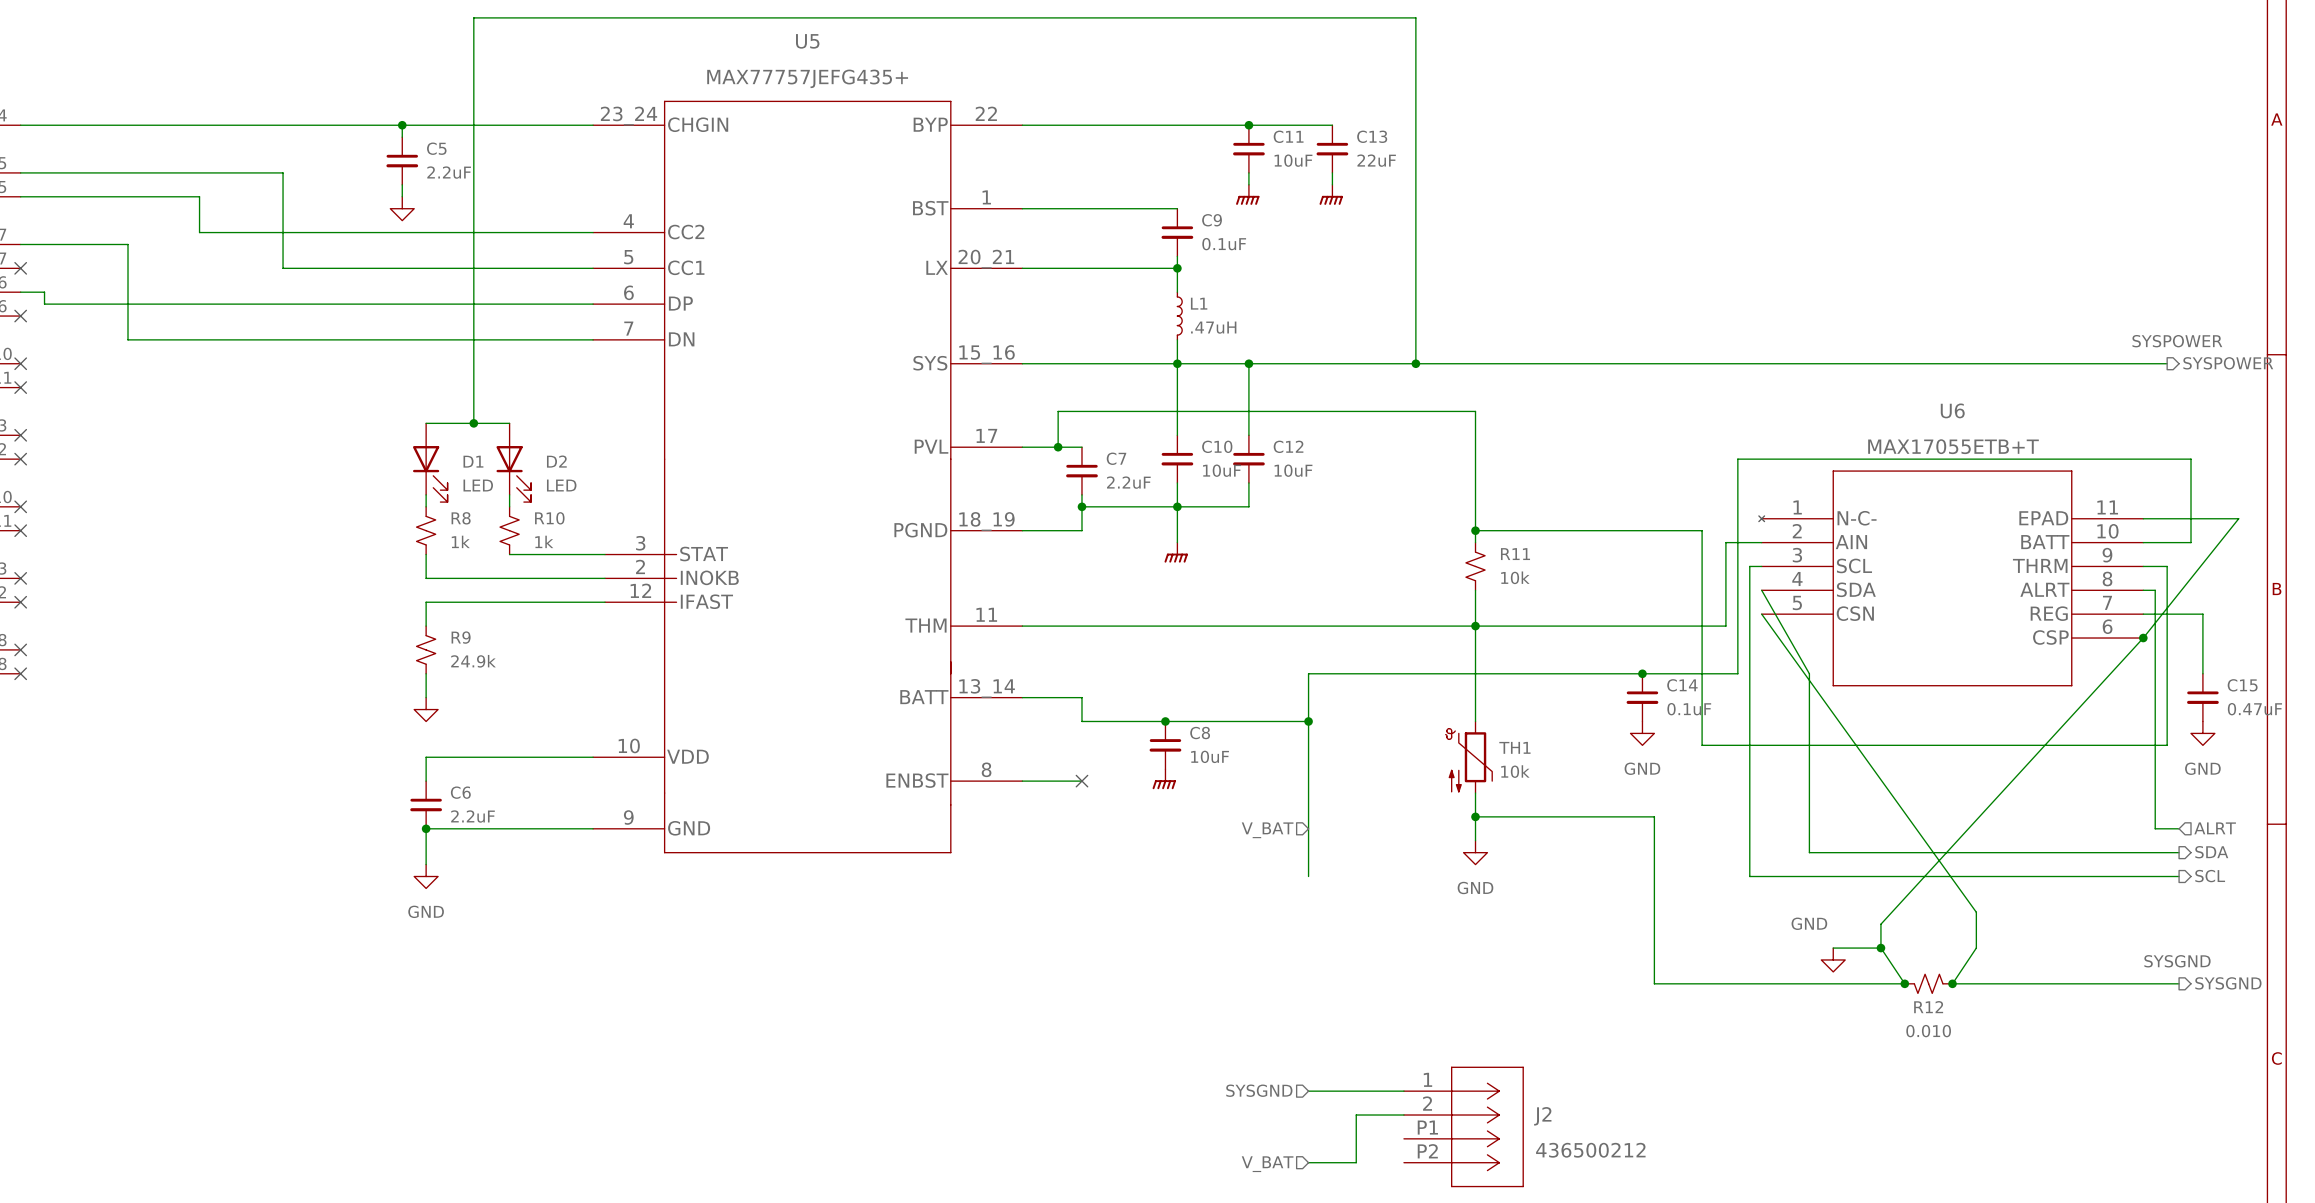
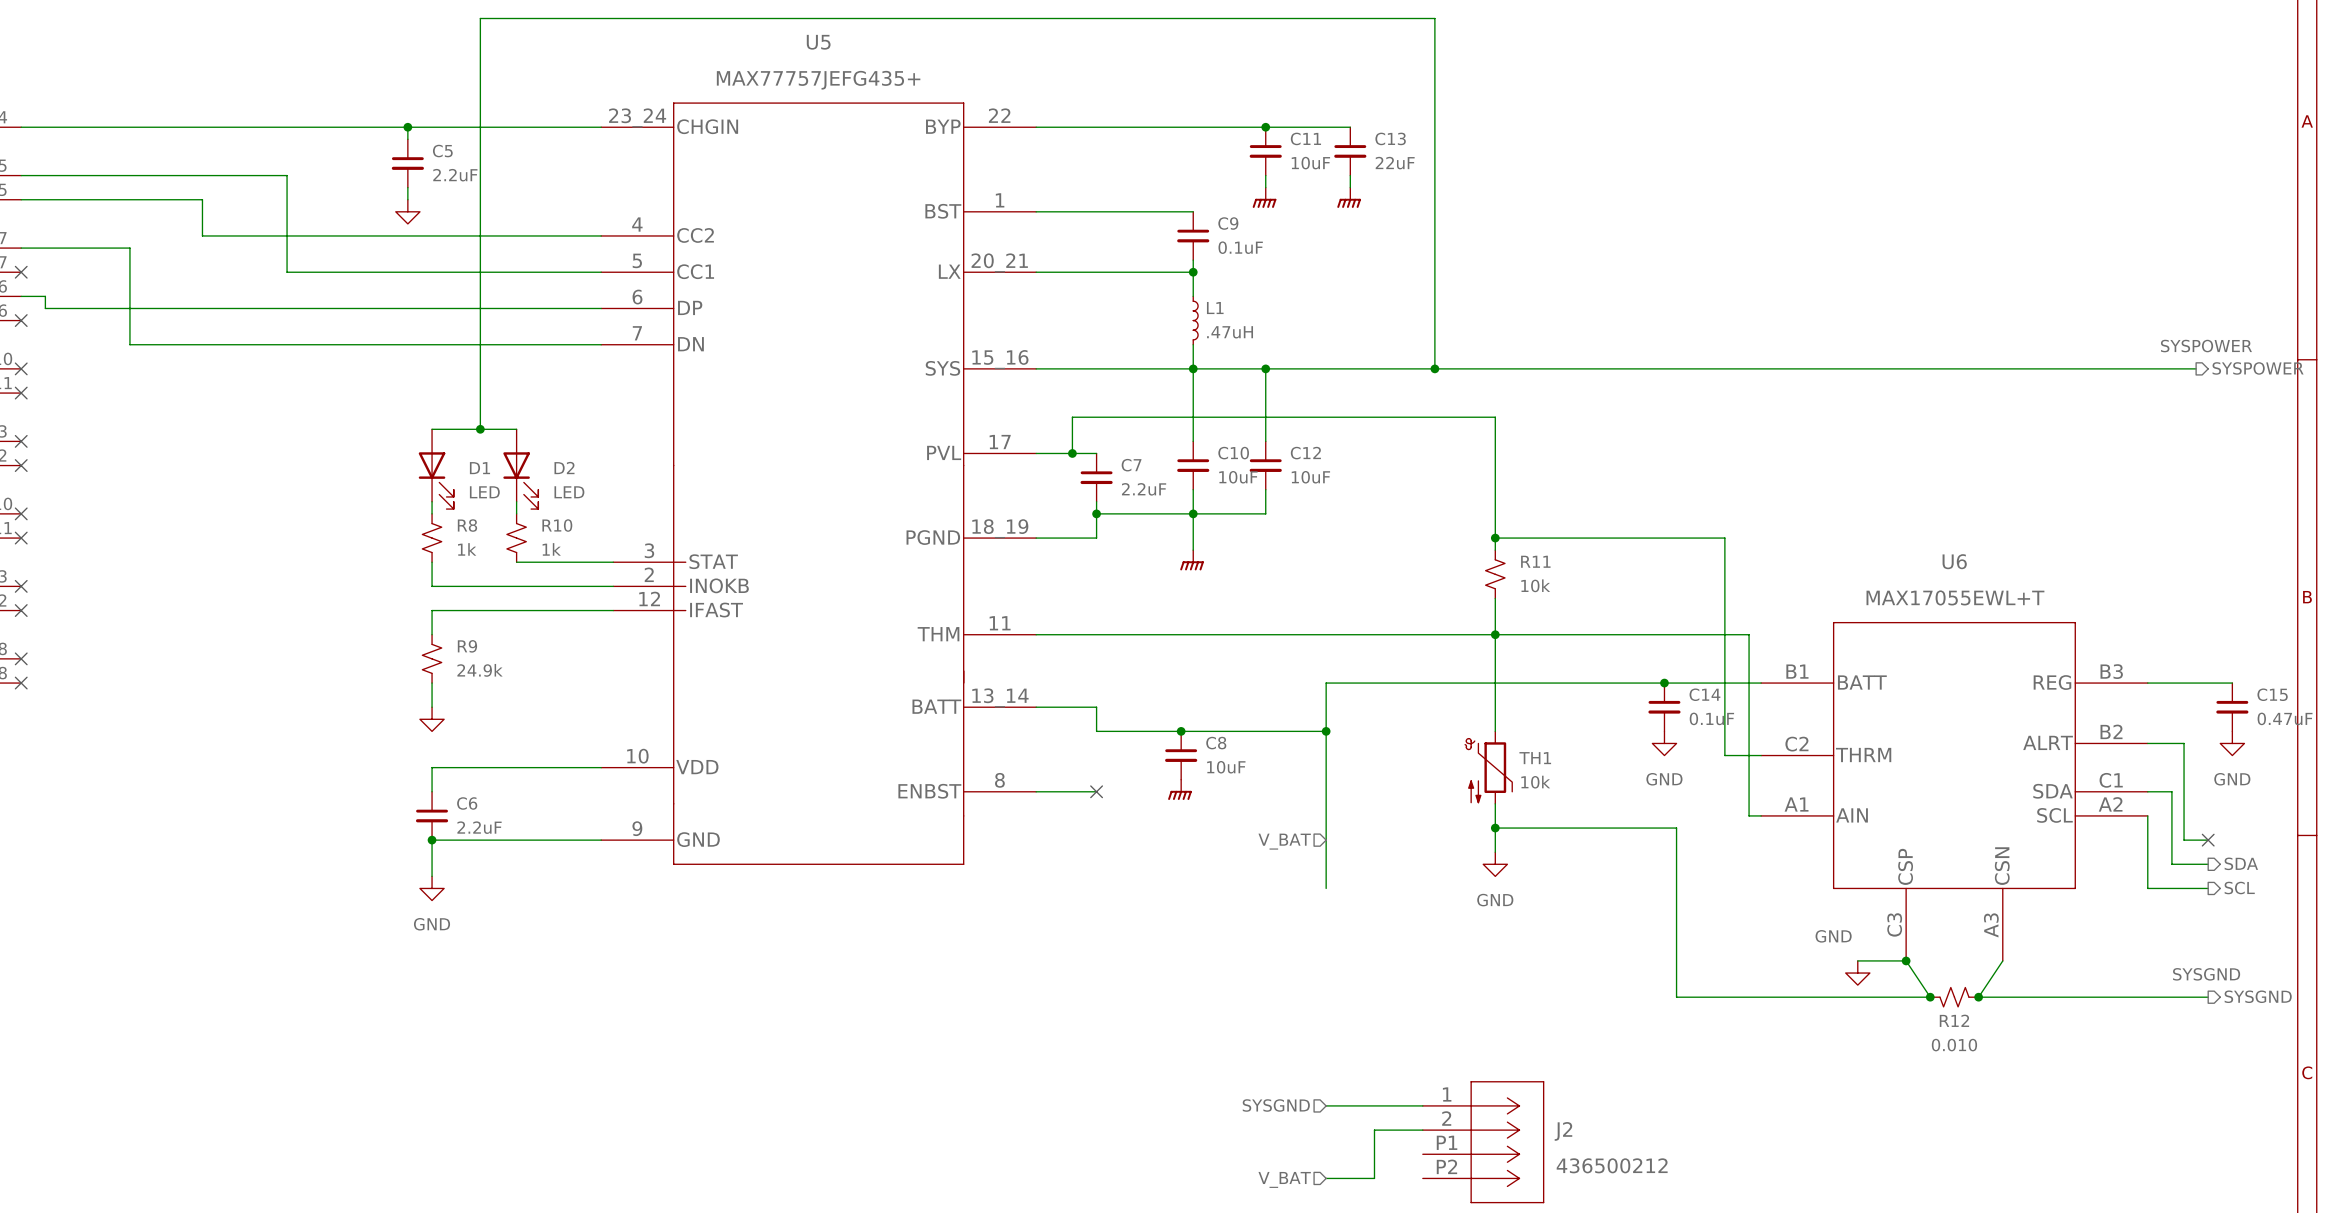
U6 name position: U6 (1952, 410) -> U6 (1954, 561)
U6 value: MAX17055ETB+T (1953, 446) -> MAX17055EWL+T (1955, 597)
U6 symbol: [1758, 470, 2144, 687] -> [1761, 622, 2148, 961]
wire: (2143, 518) (2238, 518) (2143, 638) (1880, 924) (1880, 948) -> none
wire: (1761, 542) (1725, 542) (1725, 626) -> (1761, 815) (1749, 815) (1749, 634)
wire: (2143, 542) (2191, 542) (2191, 459) (1737, 459) (1737, 673) -> none
wire: (1761, 566) (1749, 566) (1749, 876) (2119, 876) -> (2147, 815) (2147, 888)
wire: (2143, 566) (2167, 566) (2167, 745) (1737, 745) -> none
wire: (1761, 590) (1809, 673) (1809, 852) (2143, 852) -> (2147, 791) (2171, 791) (2171, 864)
wire: (2143, 590) (2155, 590) (2155, 733) -> (2147, 743) (2184, 743)
wire: (1761, 614) (1976, 912) (1976, 948) -> none
wire: (2143, 614) (2202, 614) (2202, 673) -> (2147, 683) (2232, 683)
junction: (2143, 638) -> none
no-connect mark: none -> (2208, 840)
hierarchical label: ALRT (2215, 828) -> none

